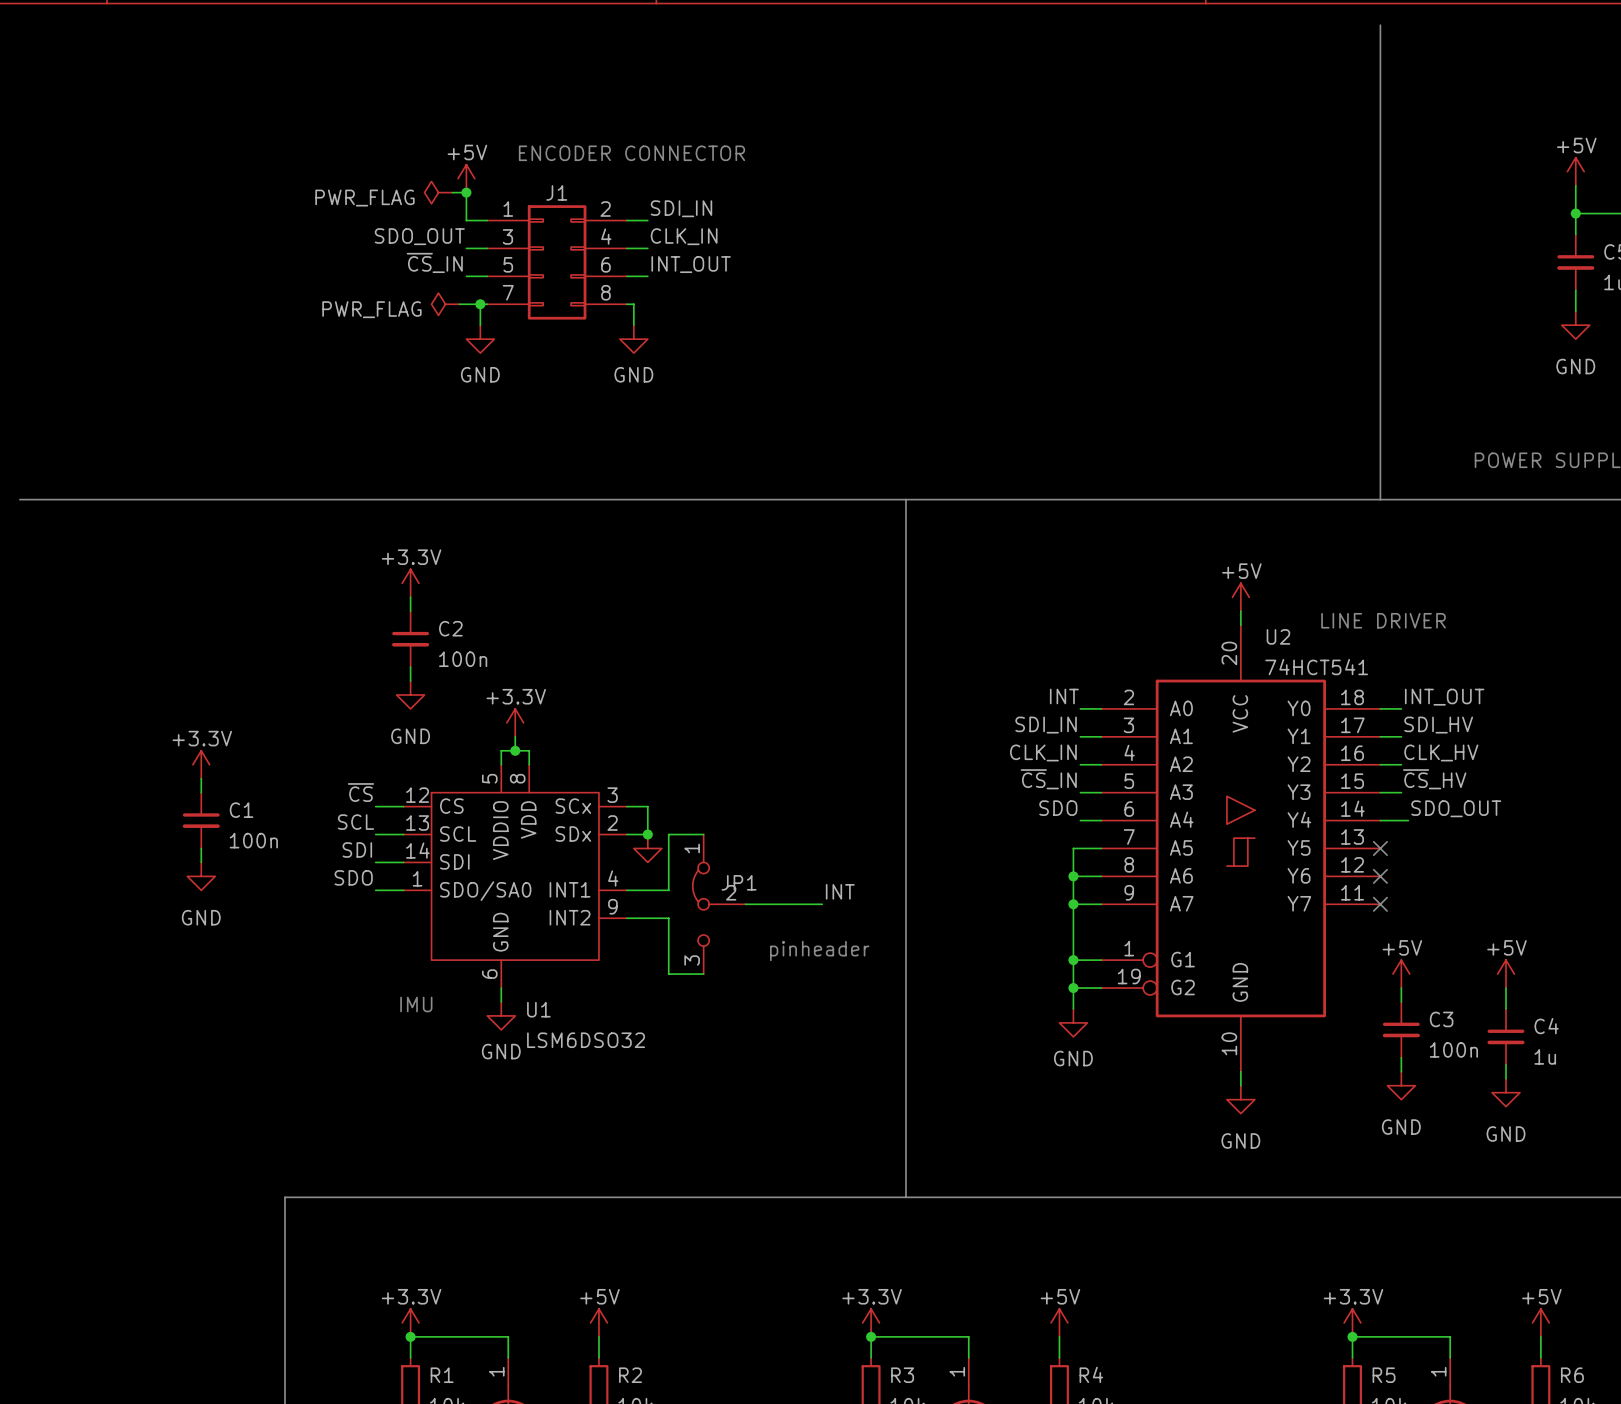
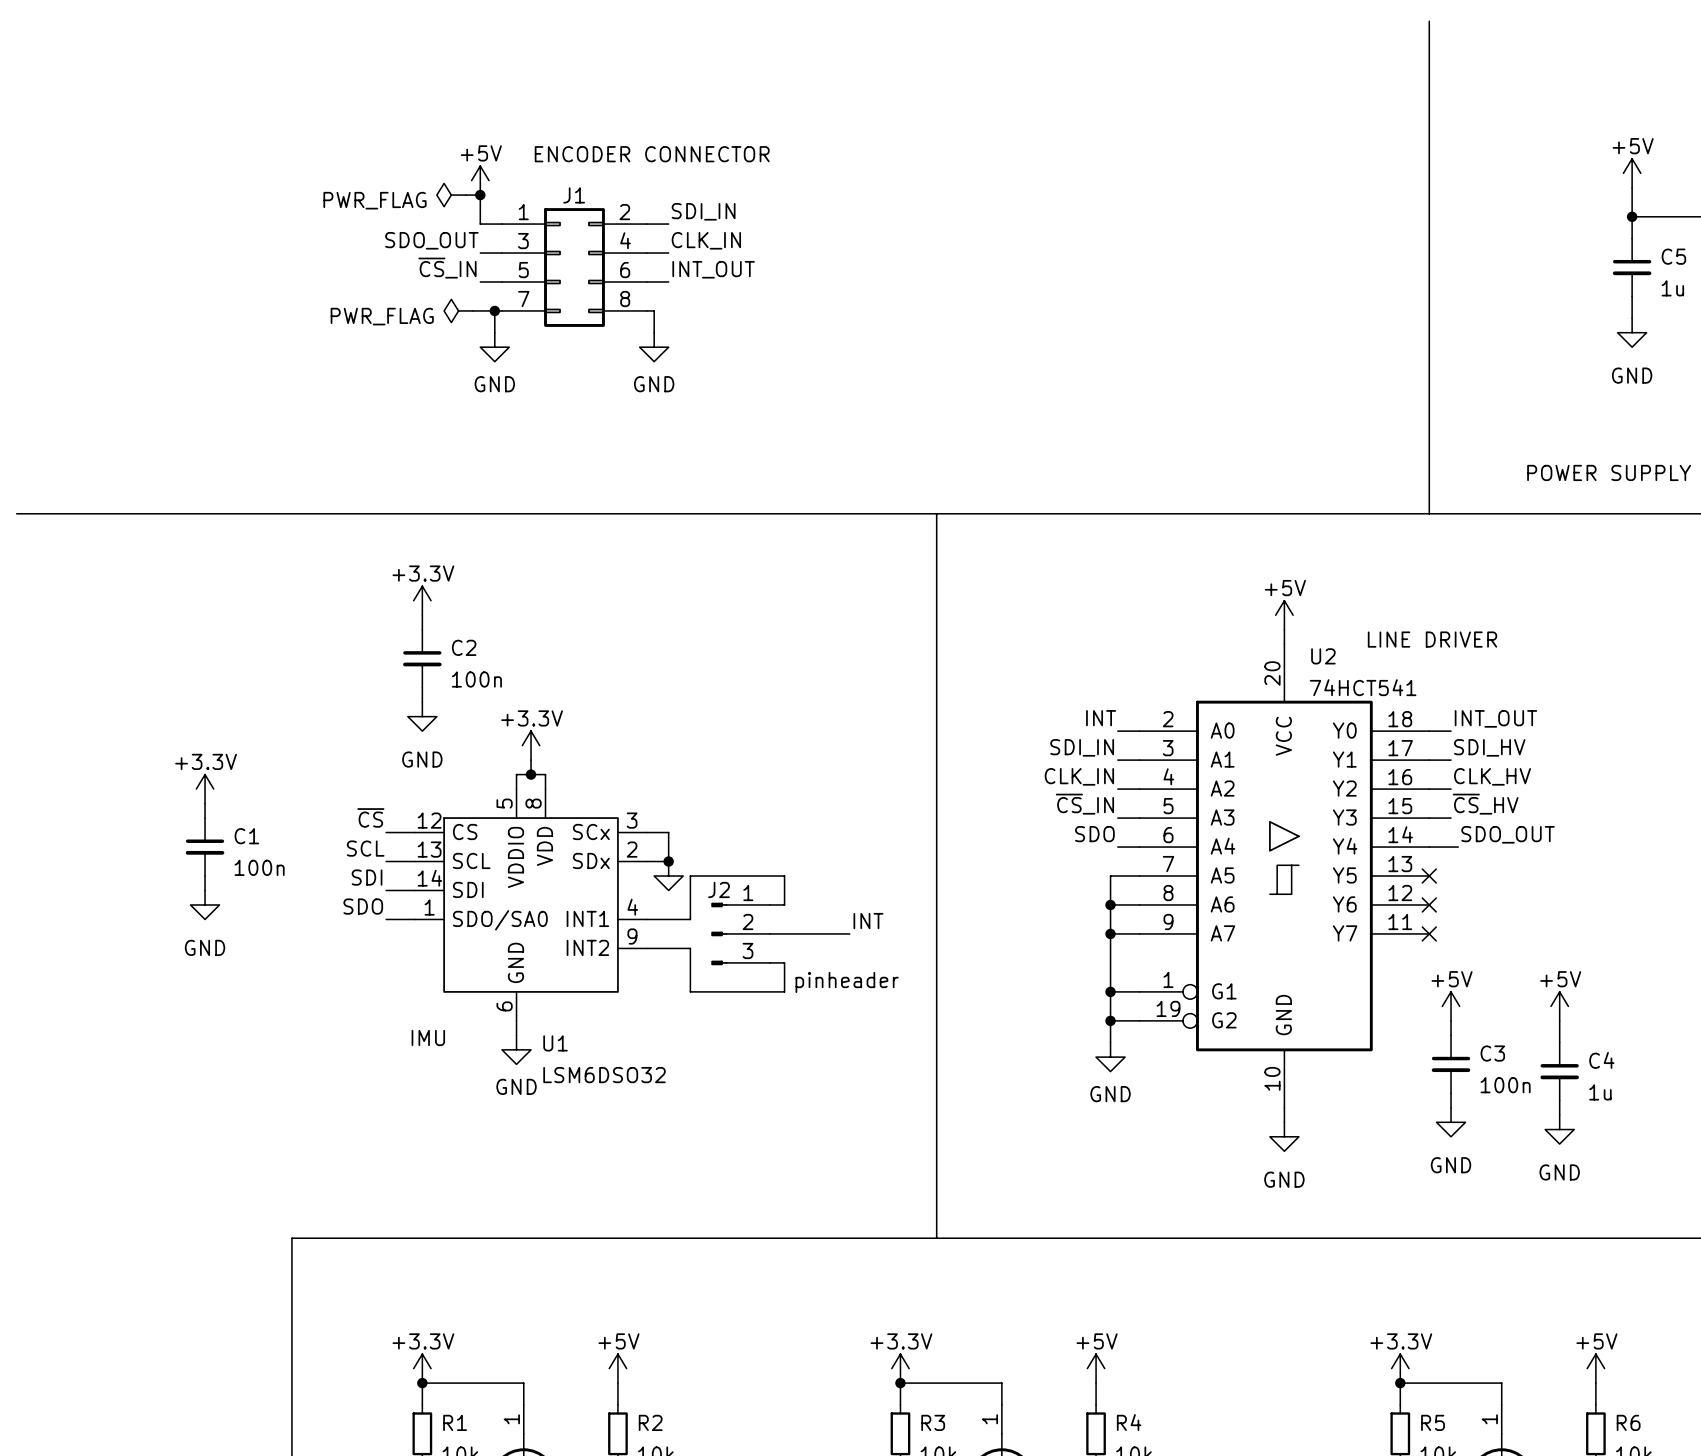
wire: (703, 834) (668, 834) (668, 848) -> (770, 904) (784, 904) (784, 876) (690, 876)
J2: none -> (740, 933)
JP1: (719, 904) -> none
wire: (668, 960) (668, 974) (703, 974) -> (690, 991) (784, 991) (784, 962) (770, 962)

